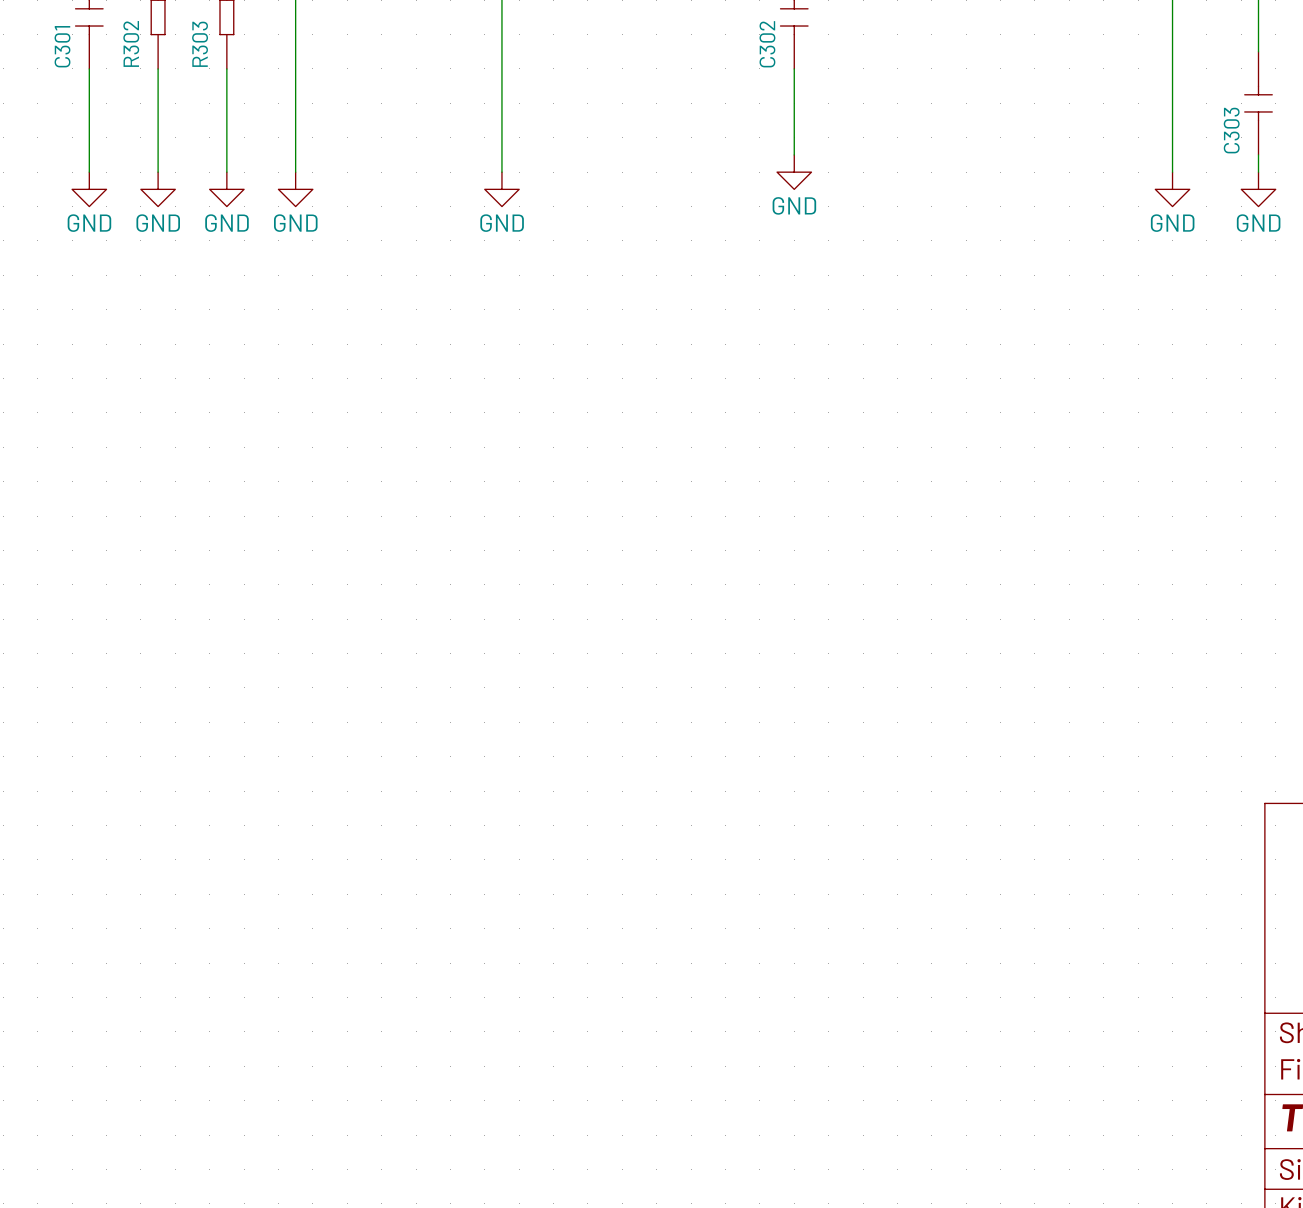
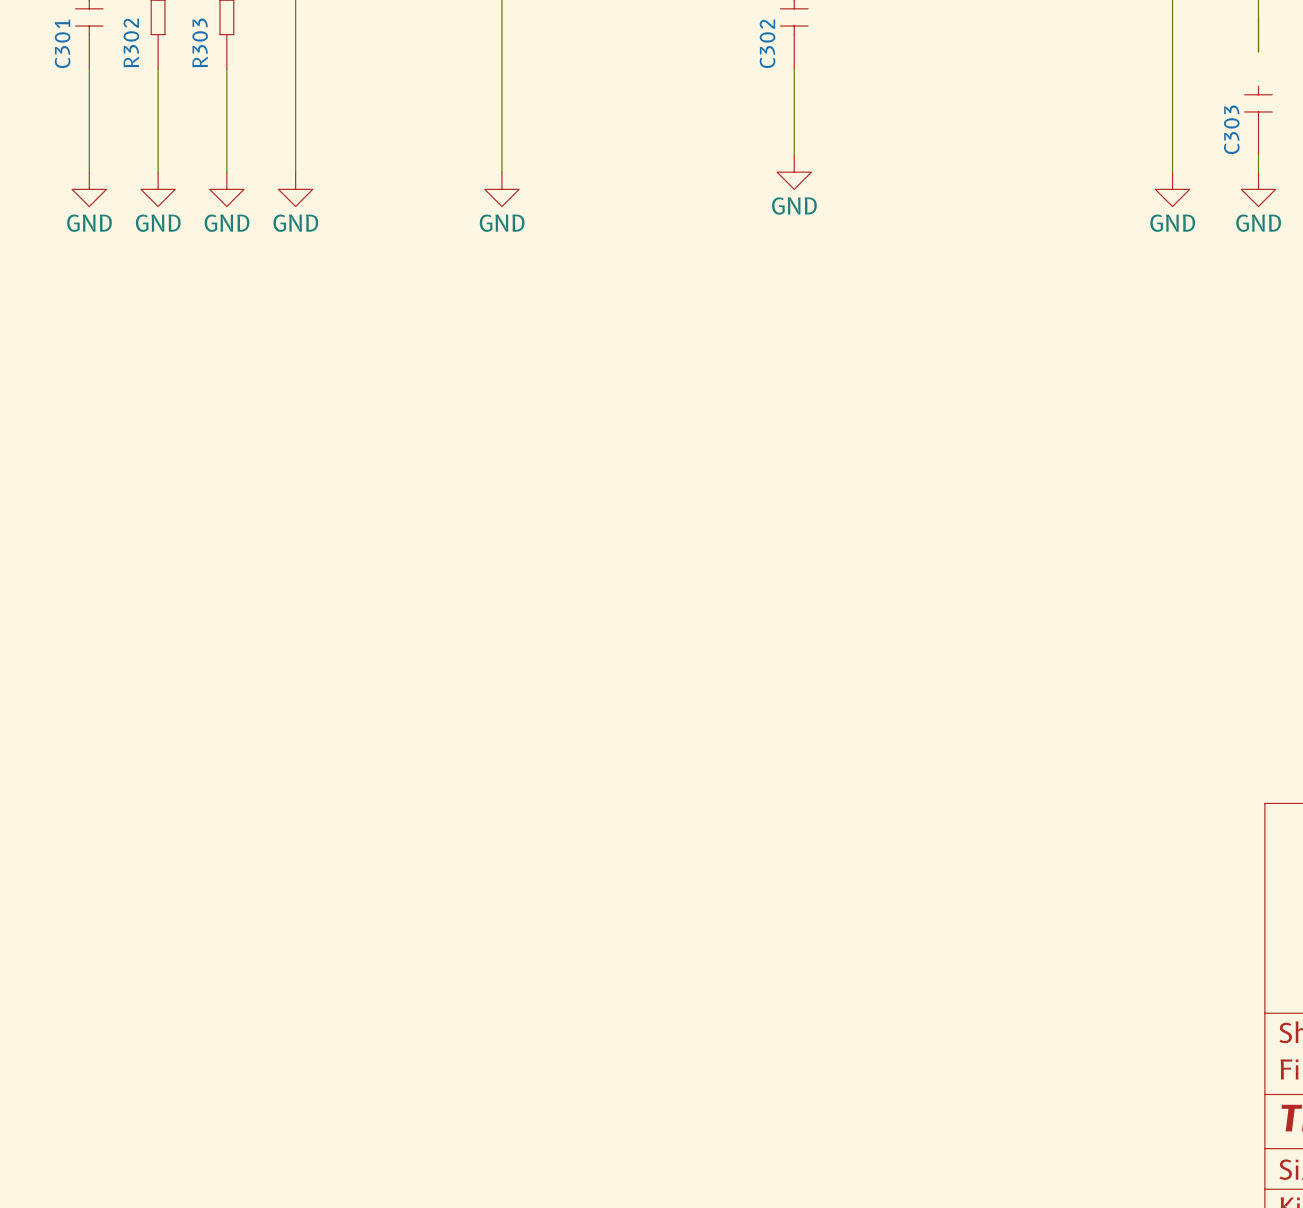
C303 symbol: [1244, 51, 1273, 155] -> [1244, 17, 1273, 155]

